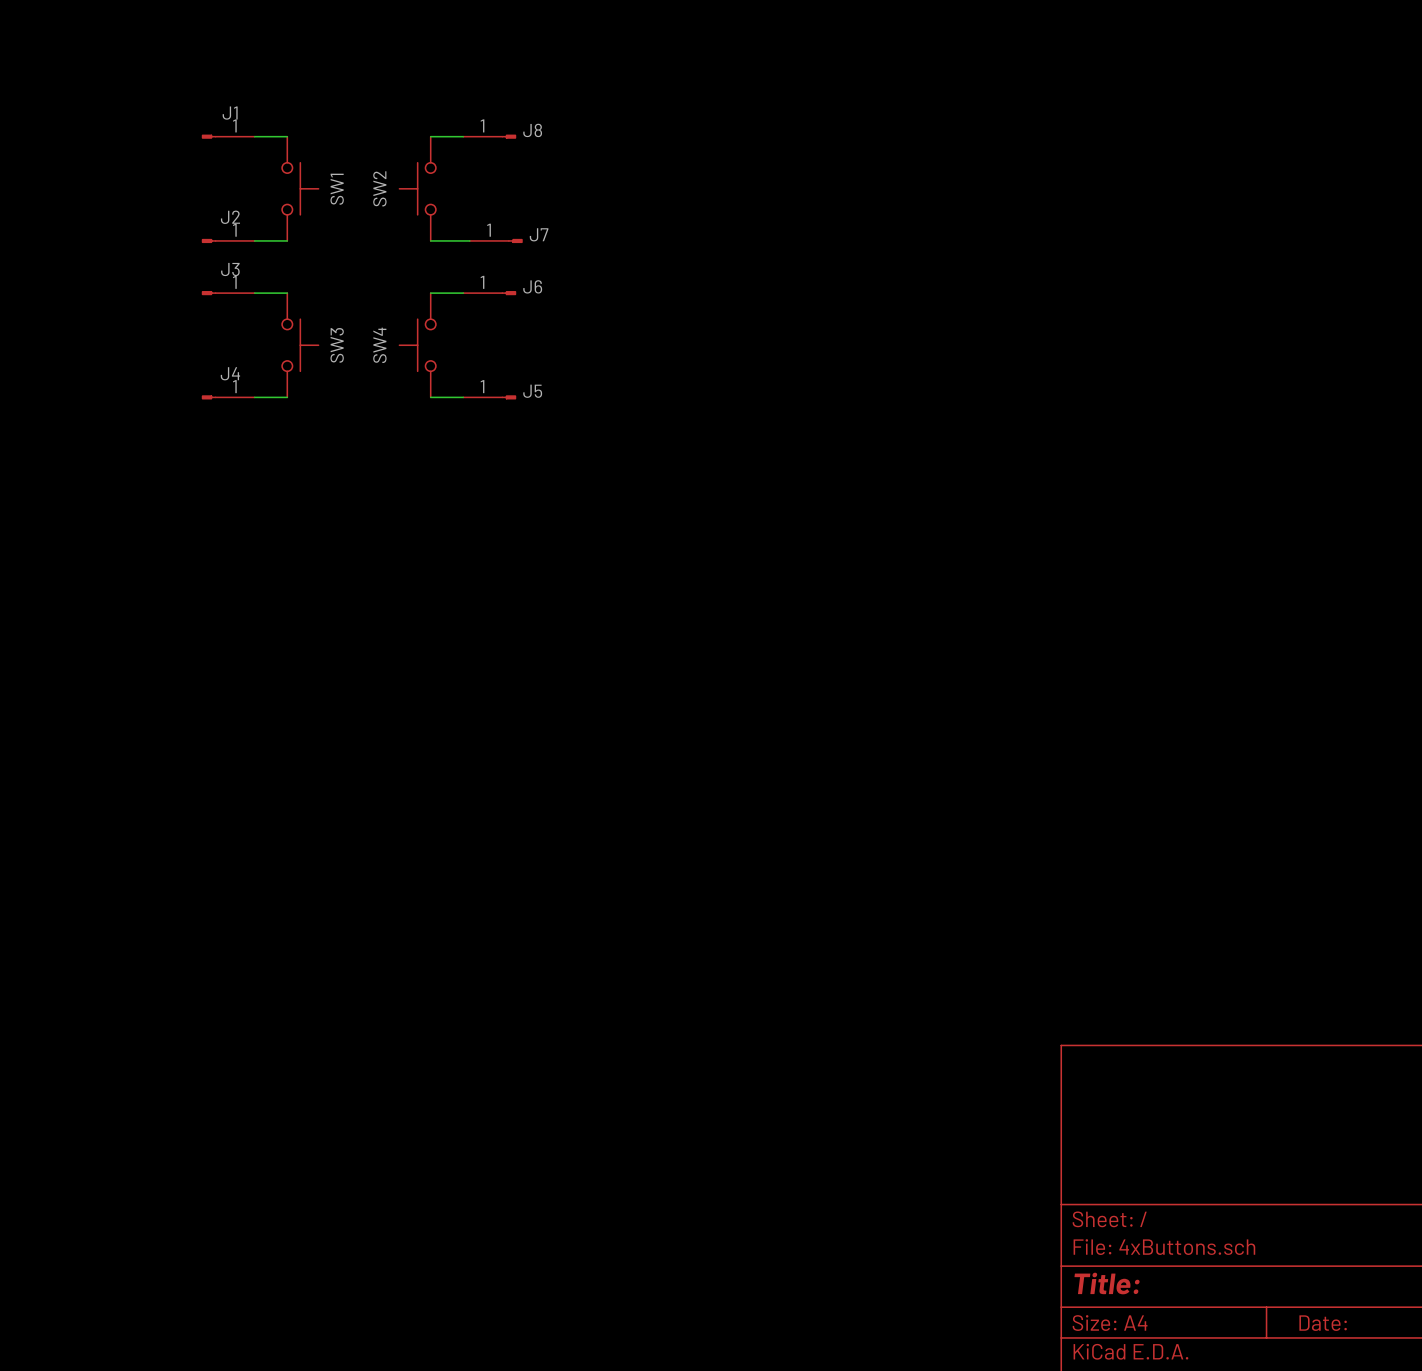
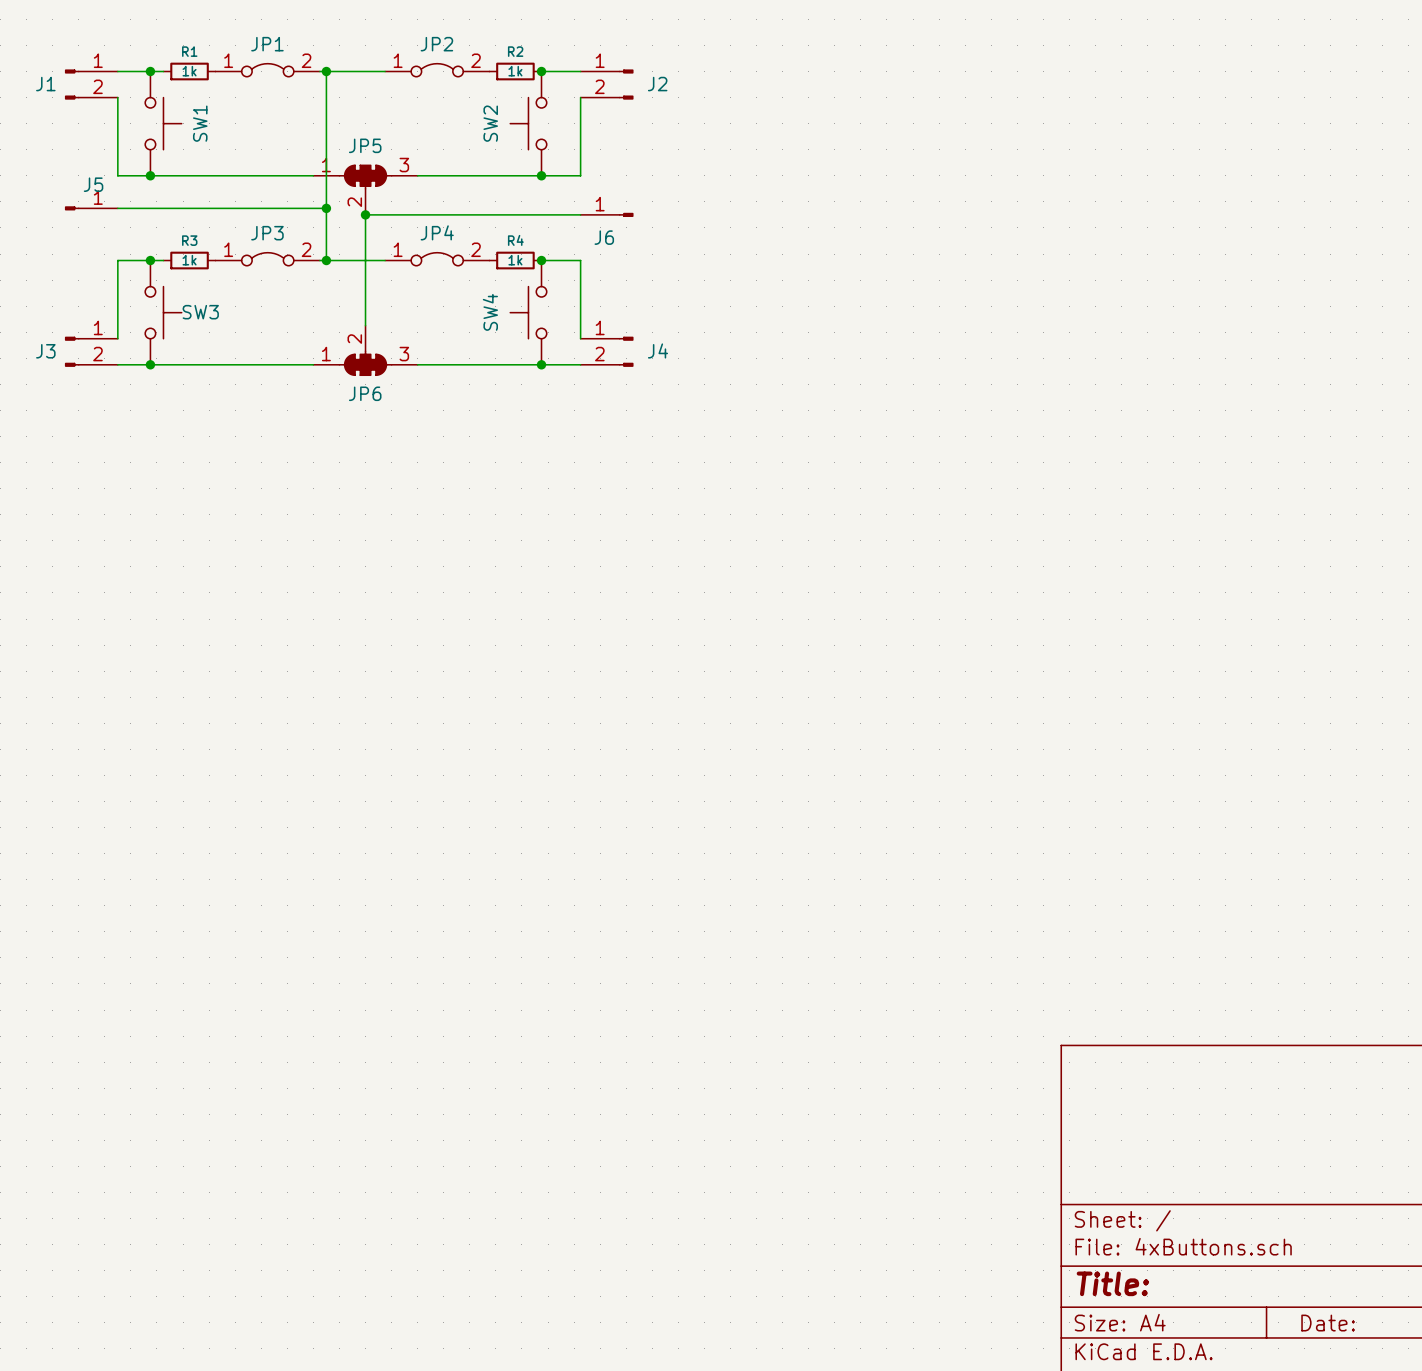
JP1: none -> (267, 70)
JP2: none -> (437, 70)
wire: none -> (117, 71) (163, 71)
junction: none -> (150, 71)
R1: none -> 1k (189, 71)
wire: none -> (319, 71) (385, 71)
wire: none -> (326, 71) (326, 260)
junction: none -> (326, 71)
R2: none -> 1k (515, 71)
junction: none -> (541, 71)
wire: none -> (117, 97) (117, 175) (313, 175)
wire: none -> (580, 97) (580, 175) (417, 175)
J1 name position: J1 (230, 113) -> J1 (45, 84)
J1 symbol: [201, 134, 255, 139] -> [64, 69, 118, 100]
wire: (254, 136) (287, 136) -> none
wire: (430, 136) (463, 136) -> none
J8: (489, 136) -> none
junction: none -> (150, 175)
junction: none -> (541, 175)
SW1 position: (300, 188) -> (163, 123)
SW2 position: (417, 188) -> (528, 123)
JP5: none -> (365, 190)
wire: none -> (117, 208) (326, 208)
junction: none -> (326, 208)
junction: none -> (365, 214)
wire: none -> (580, 214) (365, 214) (365, 325)
J2 name position: J2 (230, 217) -> J2 (657, 84)
J2 symbol: [201, 238, 255, 244] -> [580, 69, 634, 100]
wire: (254, 240) (287, 240) -> none
wire: (430, 240) (469, 240) -> (541, 71) (580, 71)
J7: (496, 240) -> none
JP3: none -> (267, 259)
JP4: none -> (437, 259)
junction: none -> (150, 260)
wire: none -> (163, 260) (117, 260) (117, 338)
R3: none -> 1k (189, 260)
wire: none -> (319, 260) (385, 260)
junction: none -> (326, 260)
R4: none -> 1k (515, 260)
wire: none -> (541, 260) (580, 260) (580, 338)
junction: none -> (541, 260)
J3 name position: J3 (230, 269) -> J3 (45, 351)
J6 name position: J6 (532, 286) -> J6 (604, 237)
J3 symbol: [201, 291, 255, 296] -> [64, 336, 118, 367]
wire: (254, 293) (287, 293) -> none
wire: (430, 293) (463, 293) -> none
J6 position: (489, 293) -> (607, 214)
SW3 position: (300, 345) -> (163, 312)
SW3 name rotation: 0° (337, 345) -> 90° clockwise (200, 312)
SW4 position: (417, 345) -> (528, 312)
JP6: none -> (365, 350)
wire: none -> (117, 364) (313, 364)
junction: none -> (150, 364)
wire: none -> (417, 364) (580, 364)
junction: none -> (541, 364)
J4 name position: J4 (230, 373) -> J4 (657, 350)
J5 name position: J5 (532, 391) -> J5 (93, 184)
J4 symbol: [201, 395, 255, 400] -> [580, 336, 634, 367]
wire: (254, 397) (287, 397) -> none
wire: (430, 397) (463, 397) -> none
J5 position: (489, 397) -> (91, 208)
J5 rotation: 0° (508, 397) -> 180° (72, 208)

